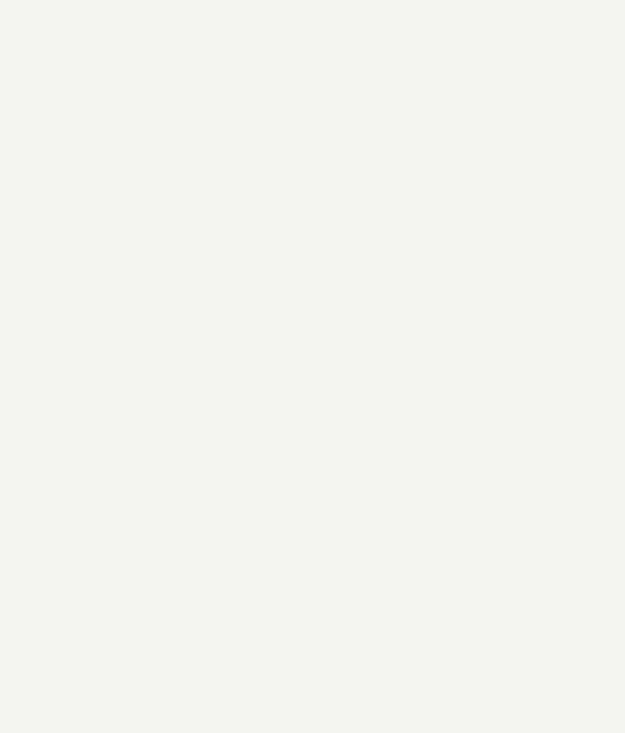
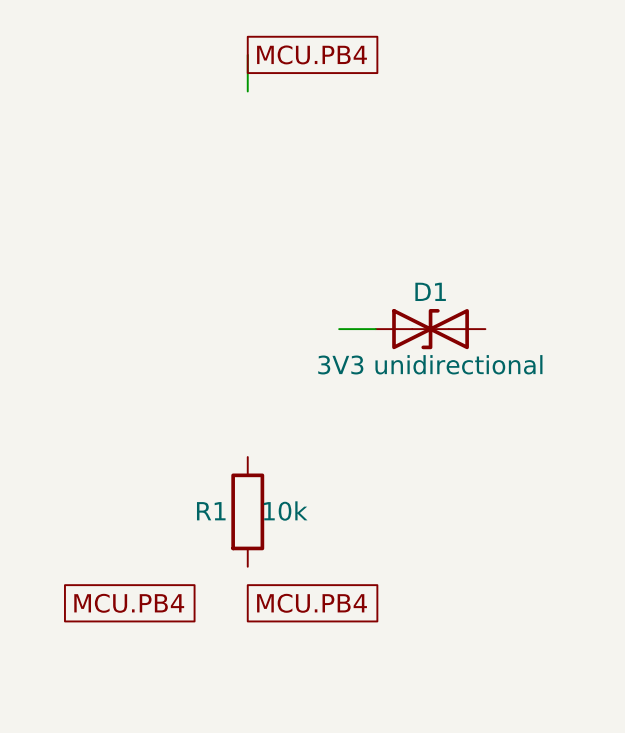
wire: none -> (247, 54) (247, 91)
global label: none -> MCU.PB4 (312, 54)
wire: none -> (339, 329) (375, 329)
D1: none -> 3V3 unidirectional (430, 329)
R1: none -> 10k (247, 511)
global label: none -> MCU.PB4 (129, 603)
global label: none -> MCU.PB4 (312, 603)

